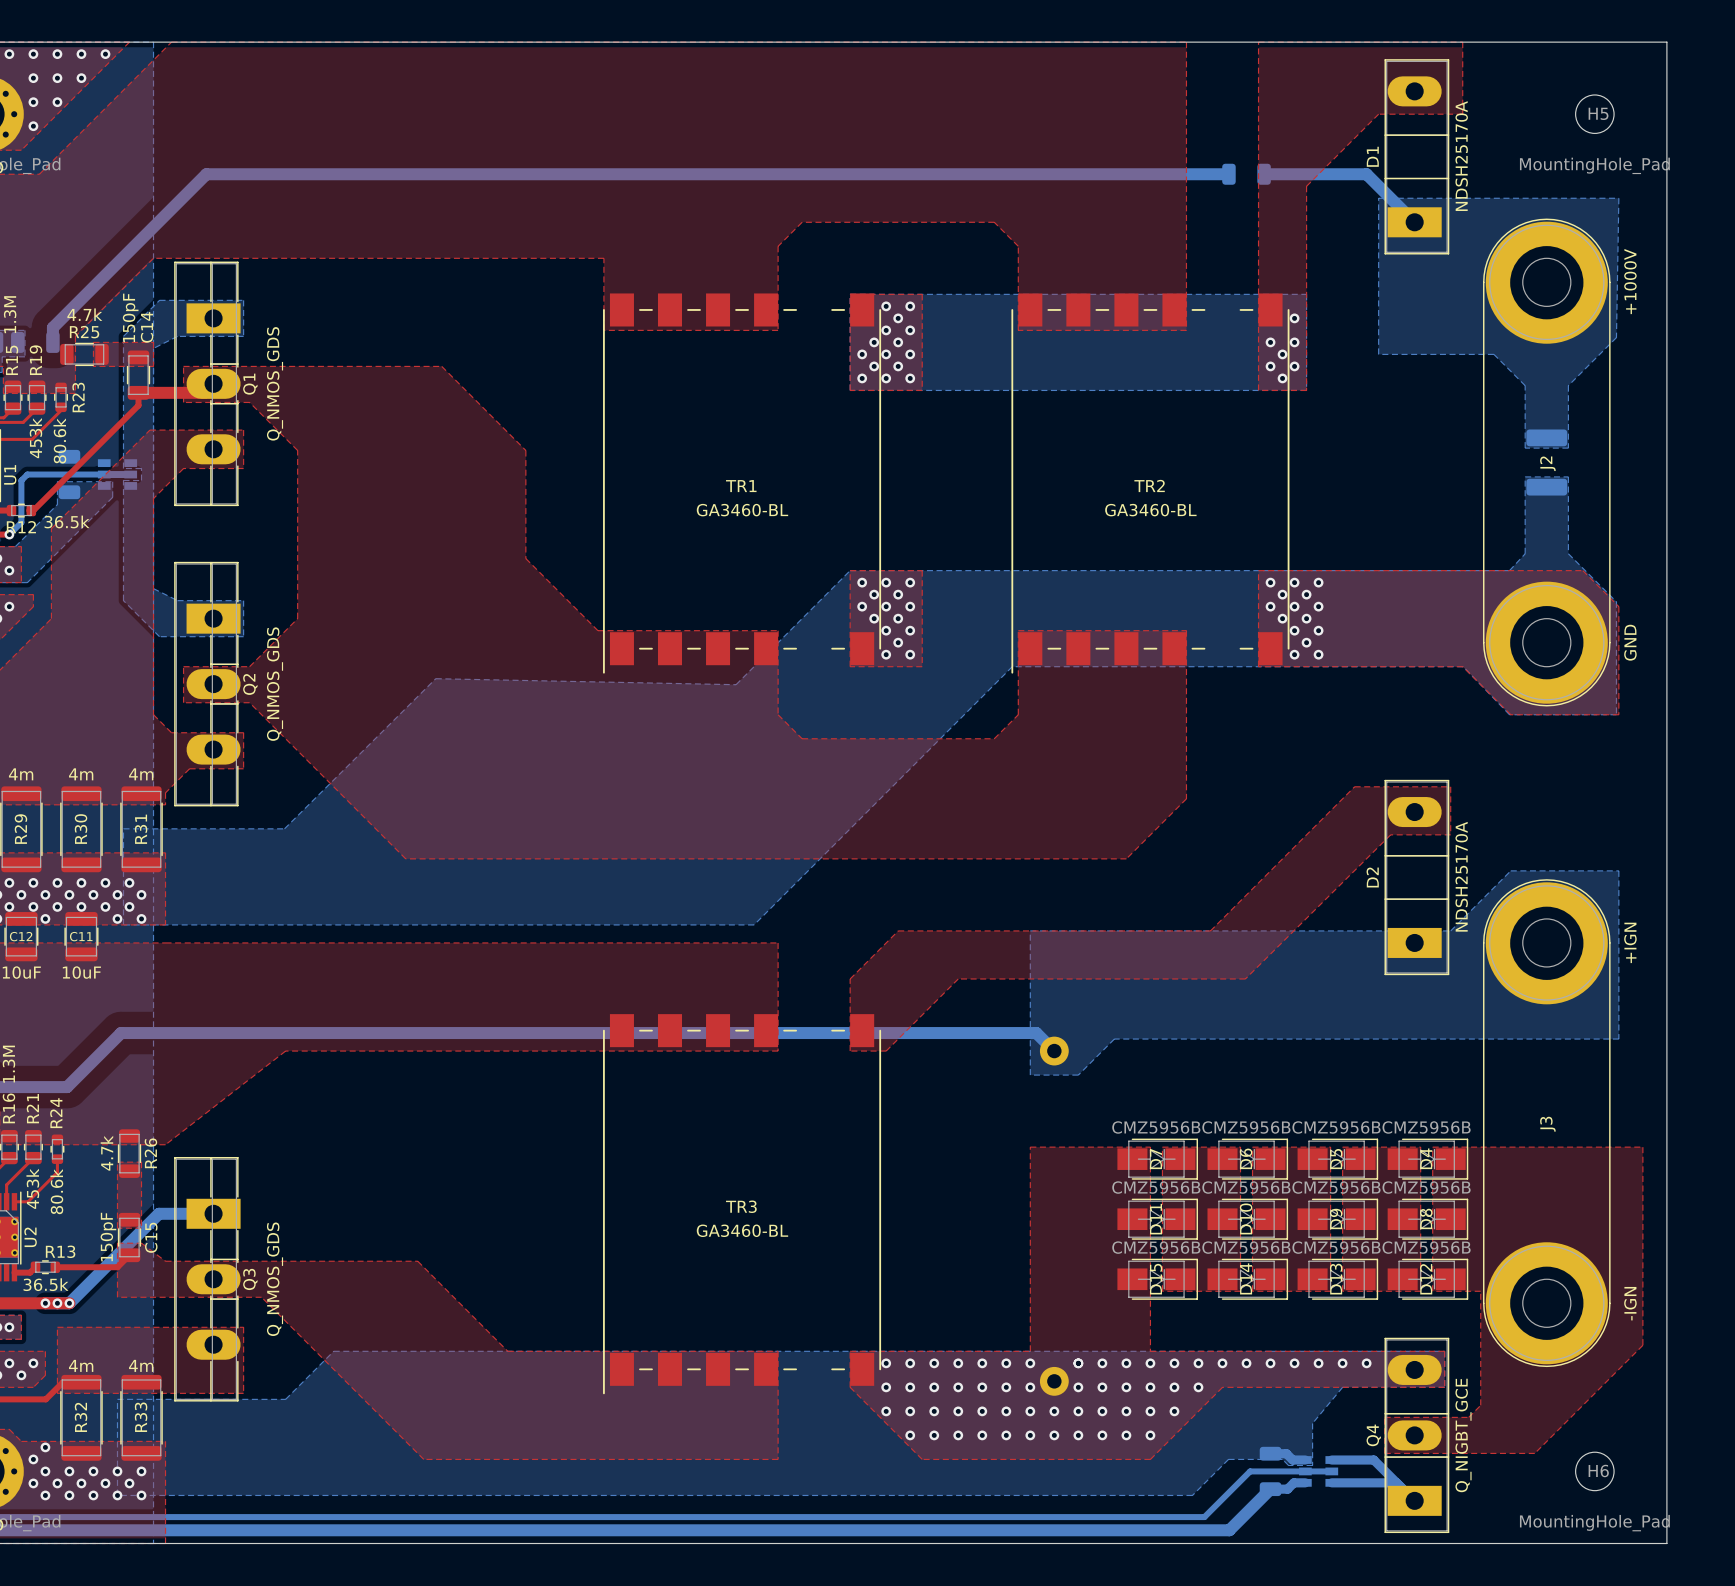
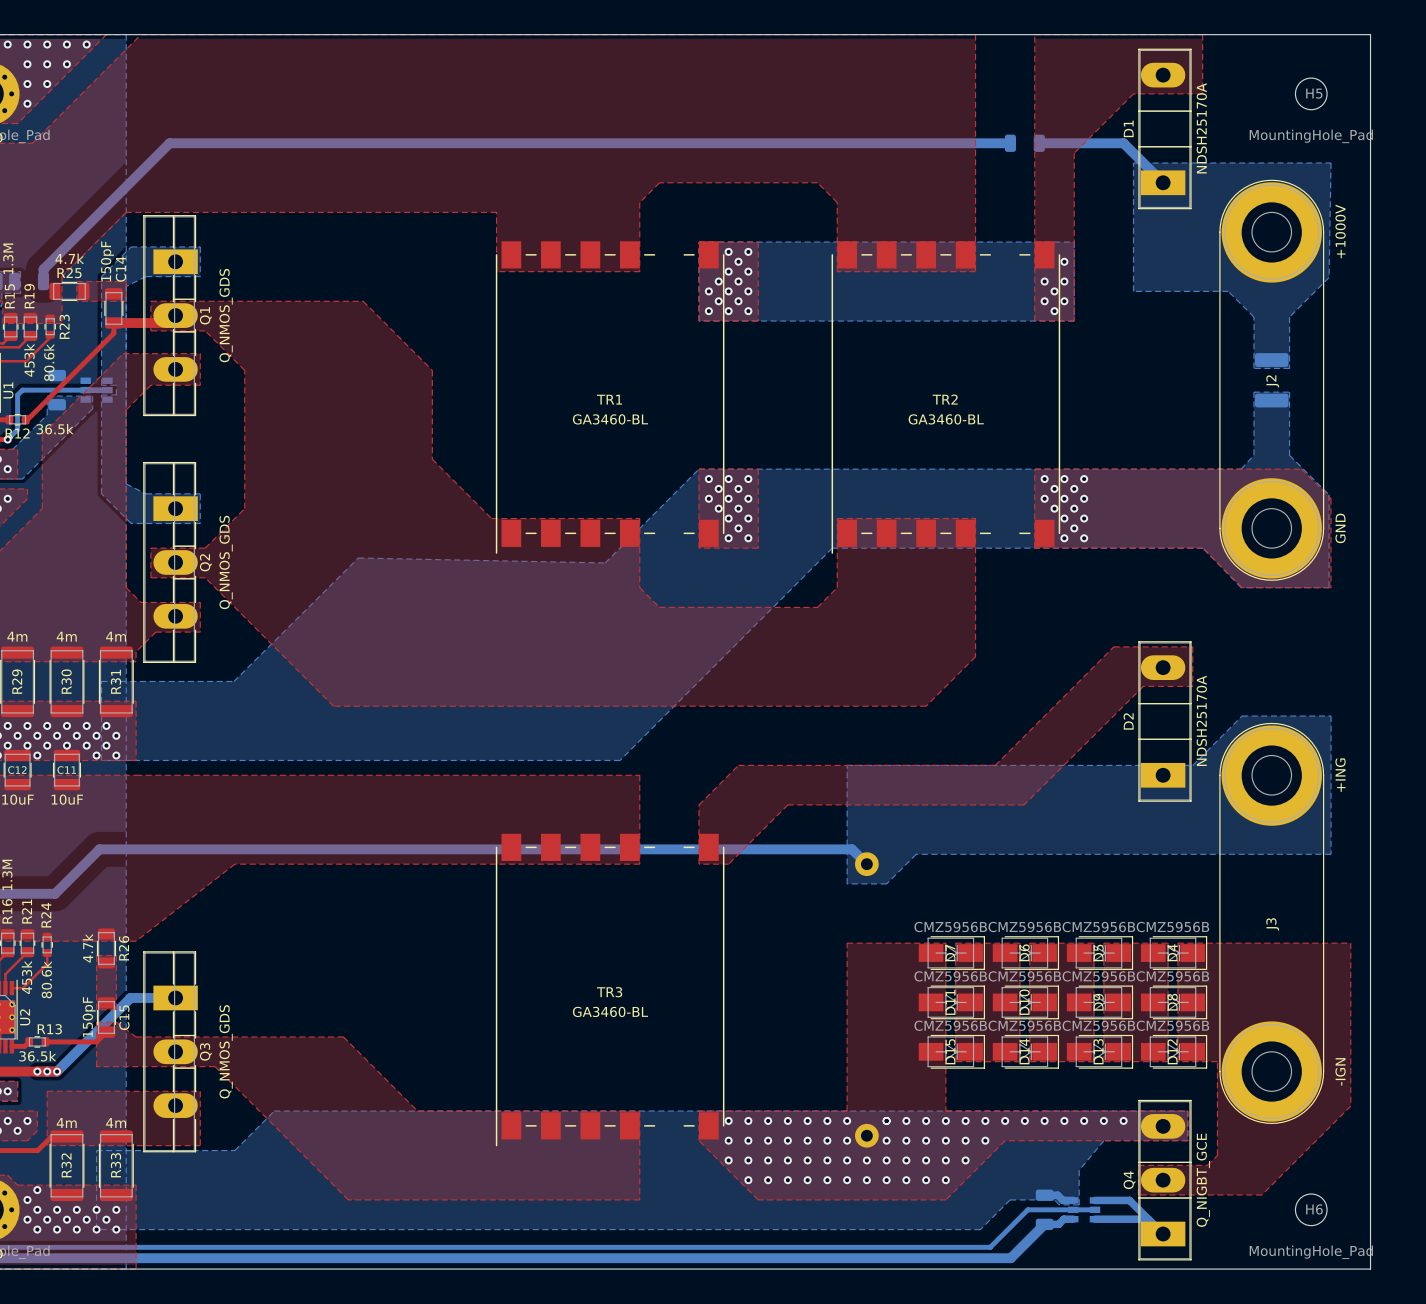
text: +IGN (1630, 942) -> +ING (1340, 775)

